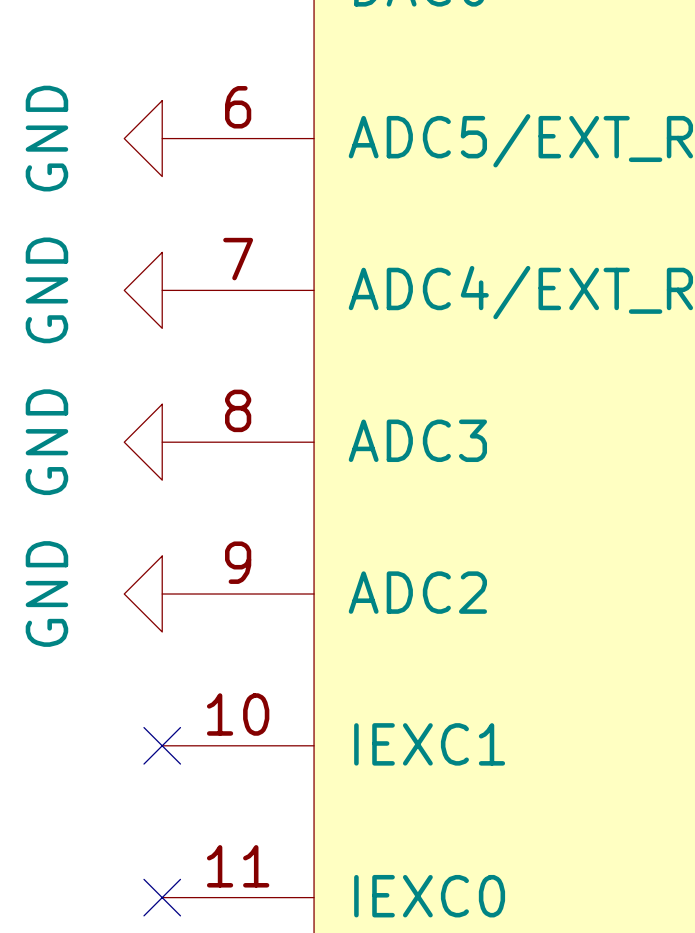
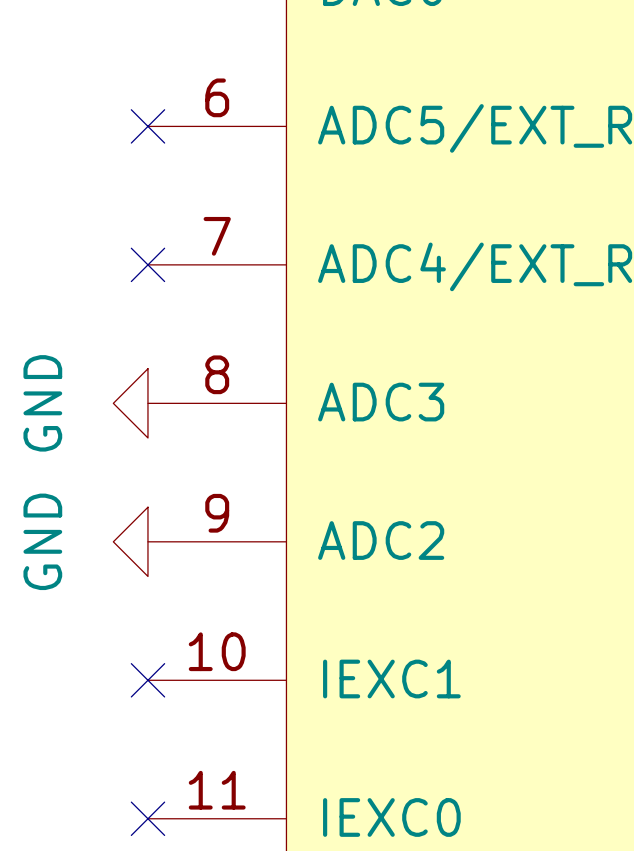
power symbol: GND (143, 138) -> none
no-connect mark: none -> (147, 126)
power symbol: GND (143, 290) -> none
no-connect mark: none -> (147, 264)

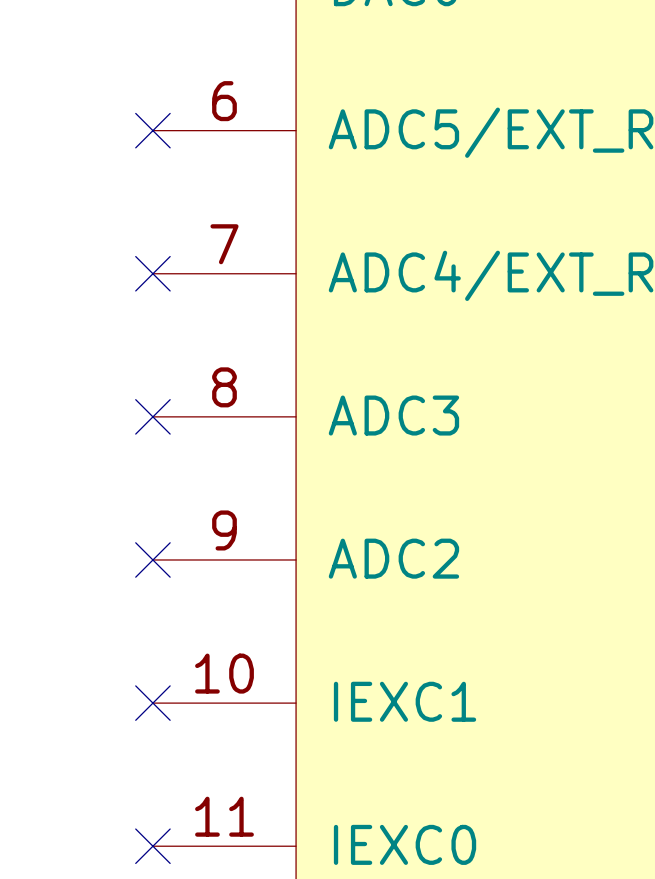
power symbol: GND (130, 403) -> none
no-connect mark: none -> (152, 416)
power symbol: GND (130, 541) -> none
no-connect mark: none -> (152, 559)

